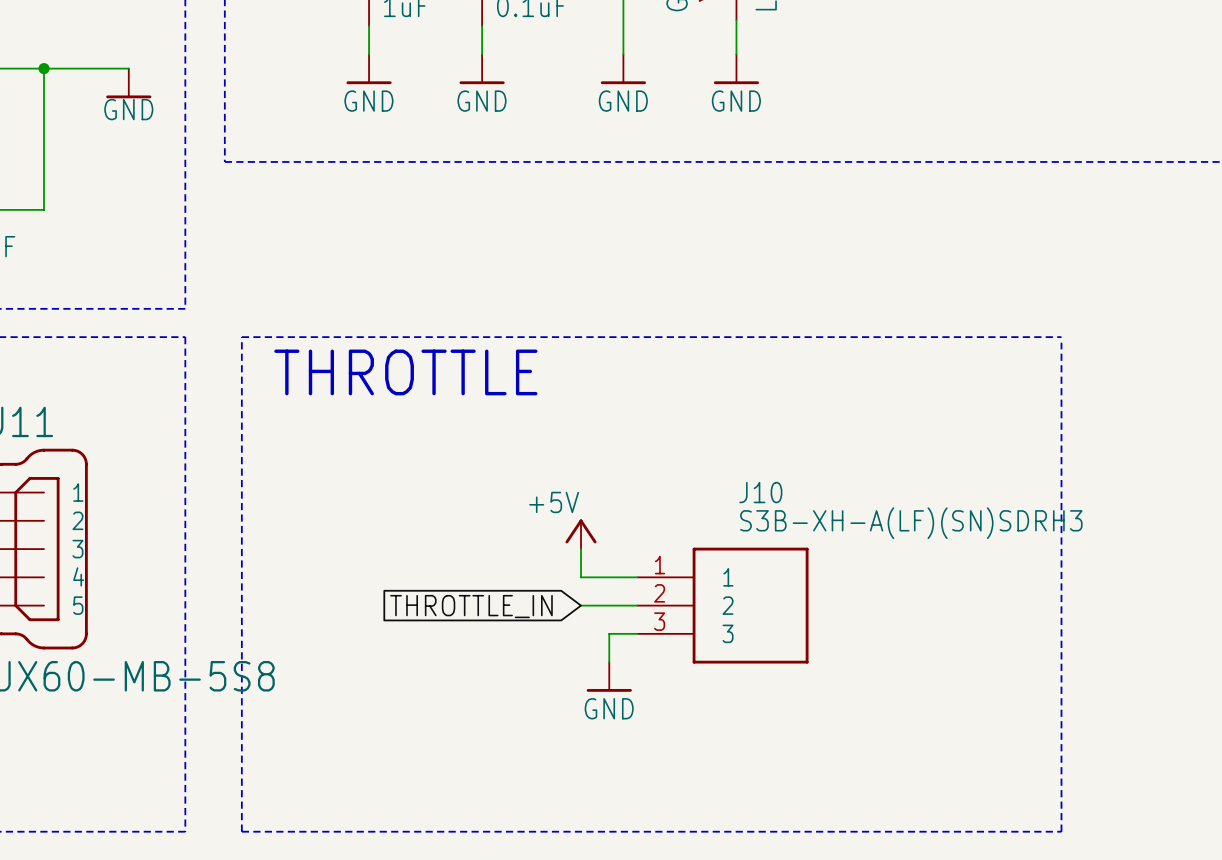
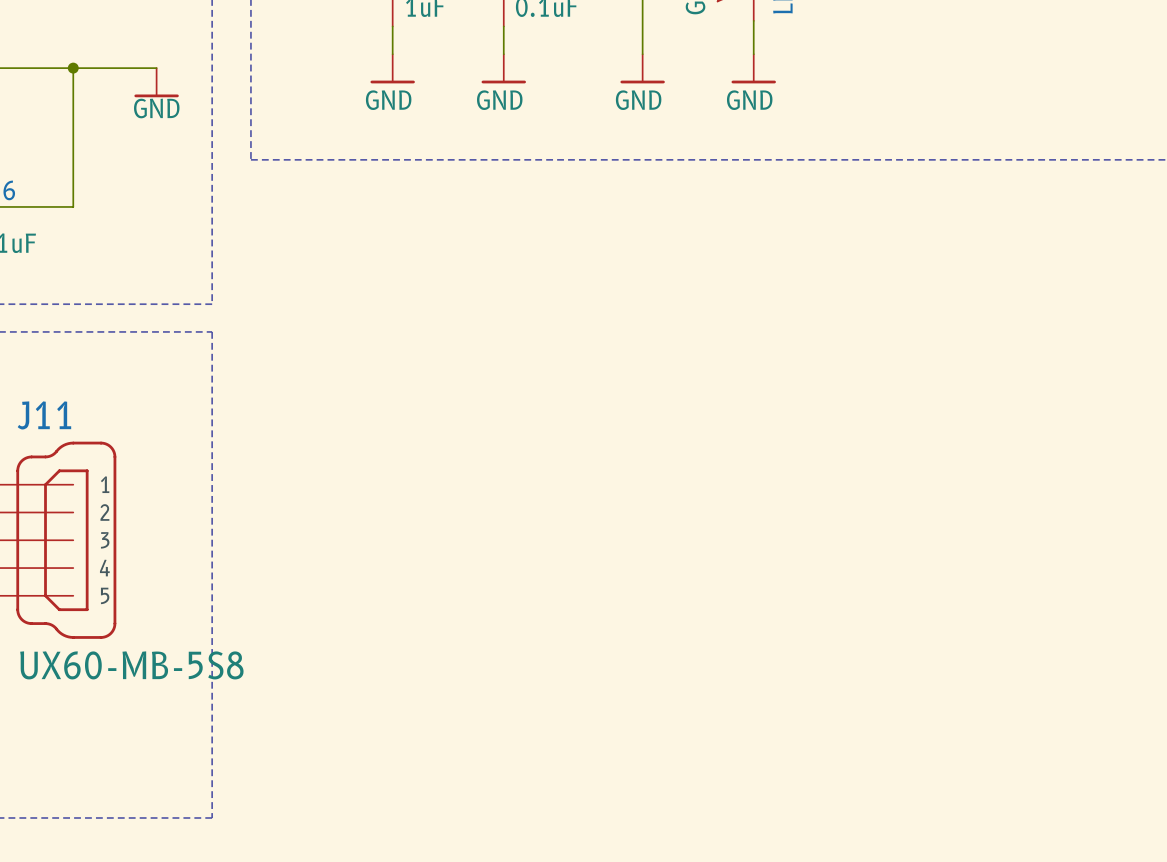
line: (1061, 337) (241, 337) (241, 831) (1061, 831) (1061, 342) -> none
text: THROTTLE (405, 372) -> none
power symbol: +5V (581, 534) -> none
wire: (581, 549) (581, 577) (637, 577) -> none
wire: (581, 605) (637, 605) -> none
J10: S3B-XH-A(LF)(SN)SDRH3 (723, 605) -> none
global label: THROTTLE_IN (471, 606) -> none
wire: (637, 633) (609, 633) (609, 662) -> none
power symbol: GND (609, 676) -> none

